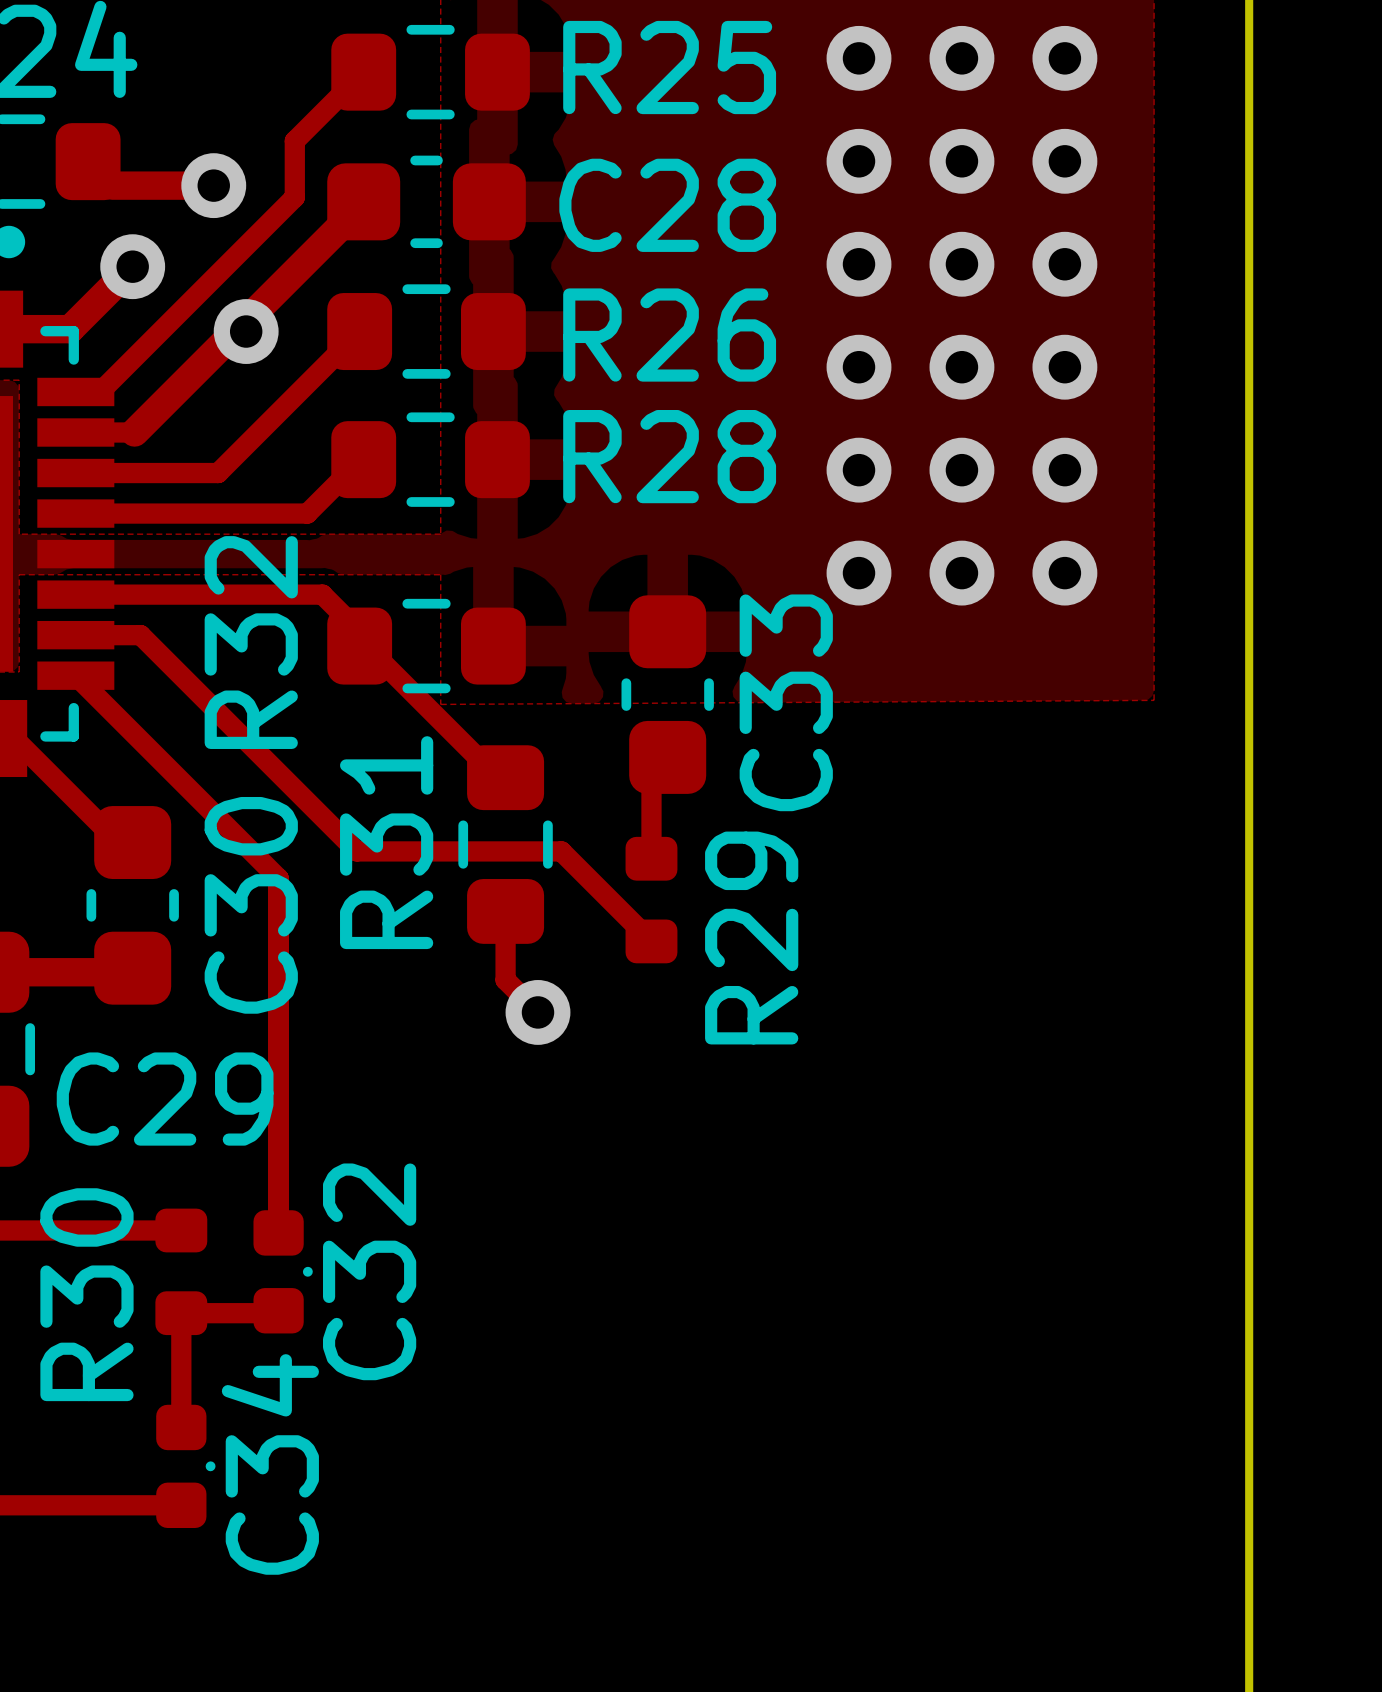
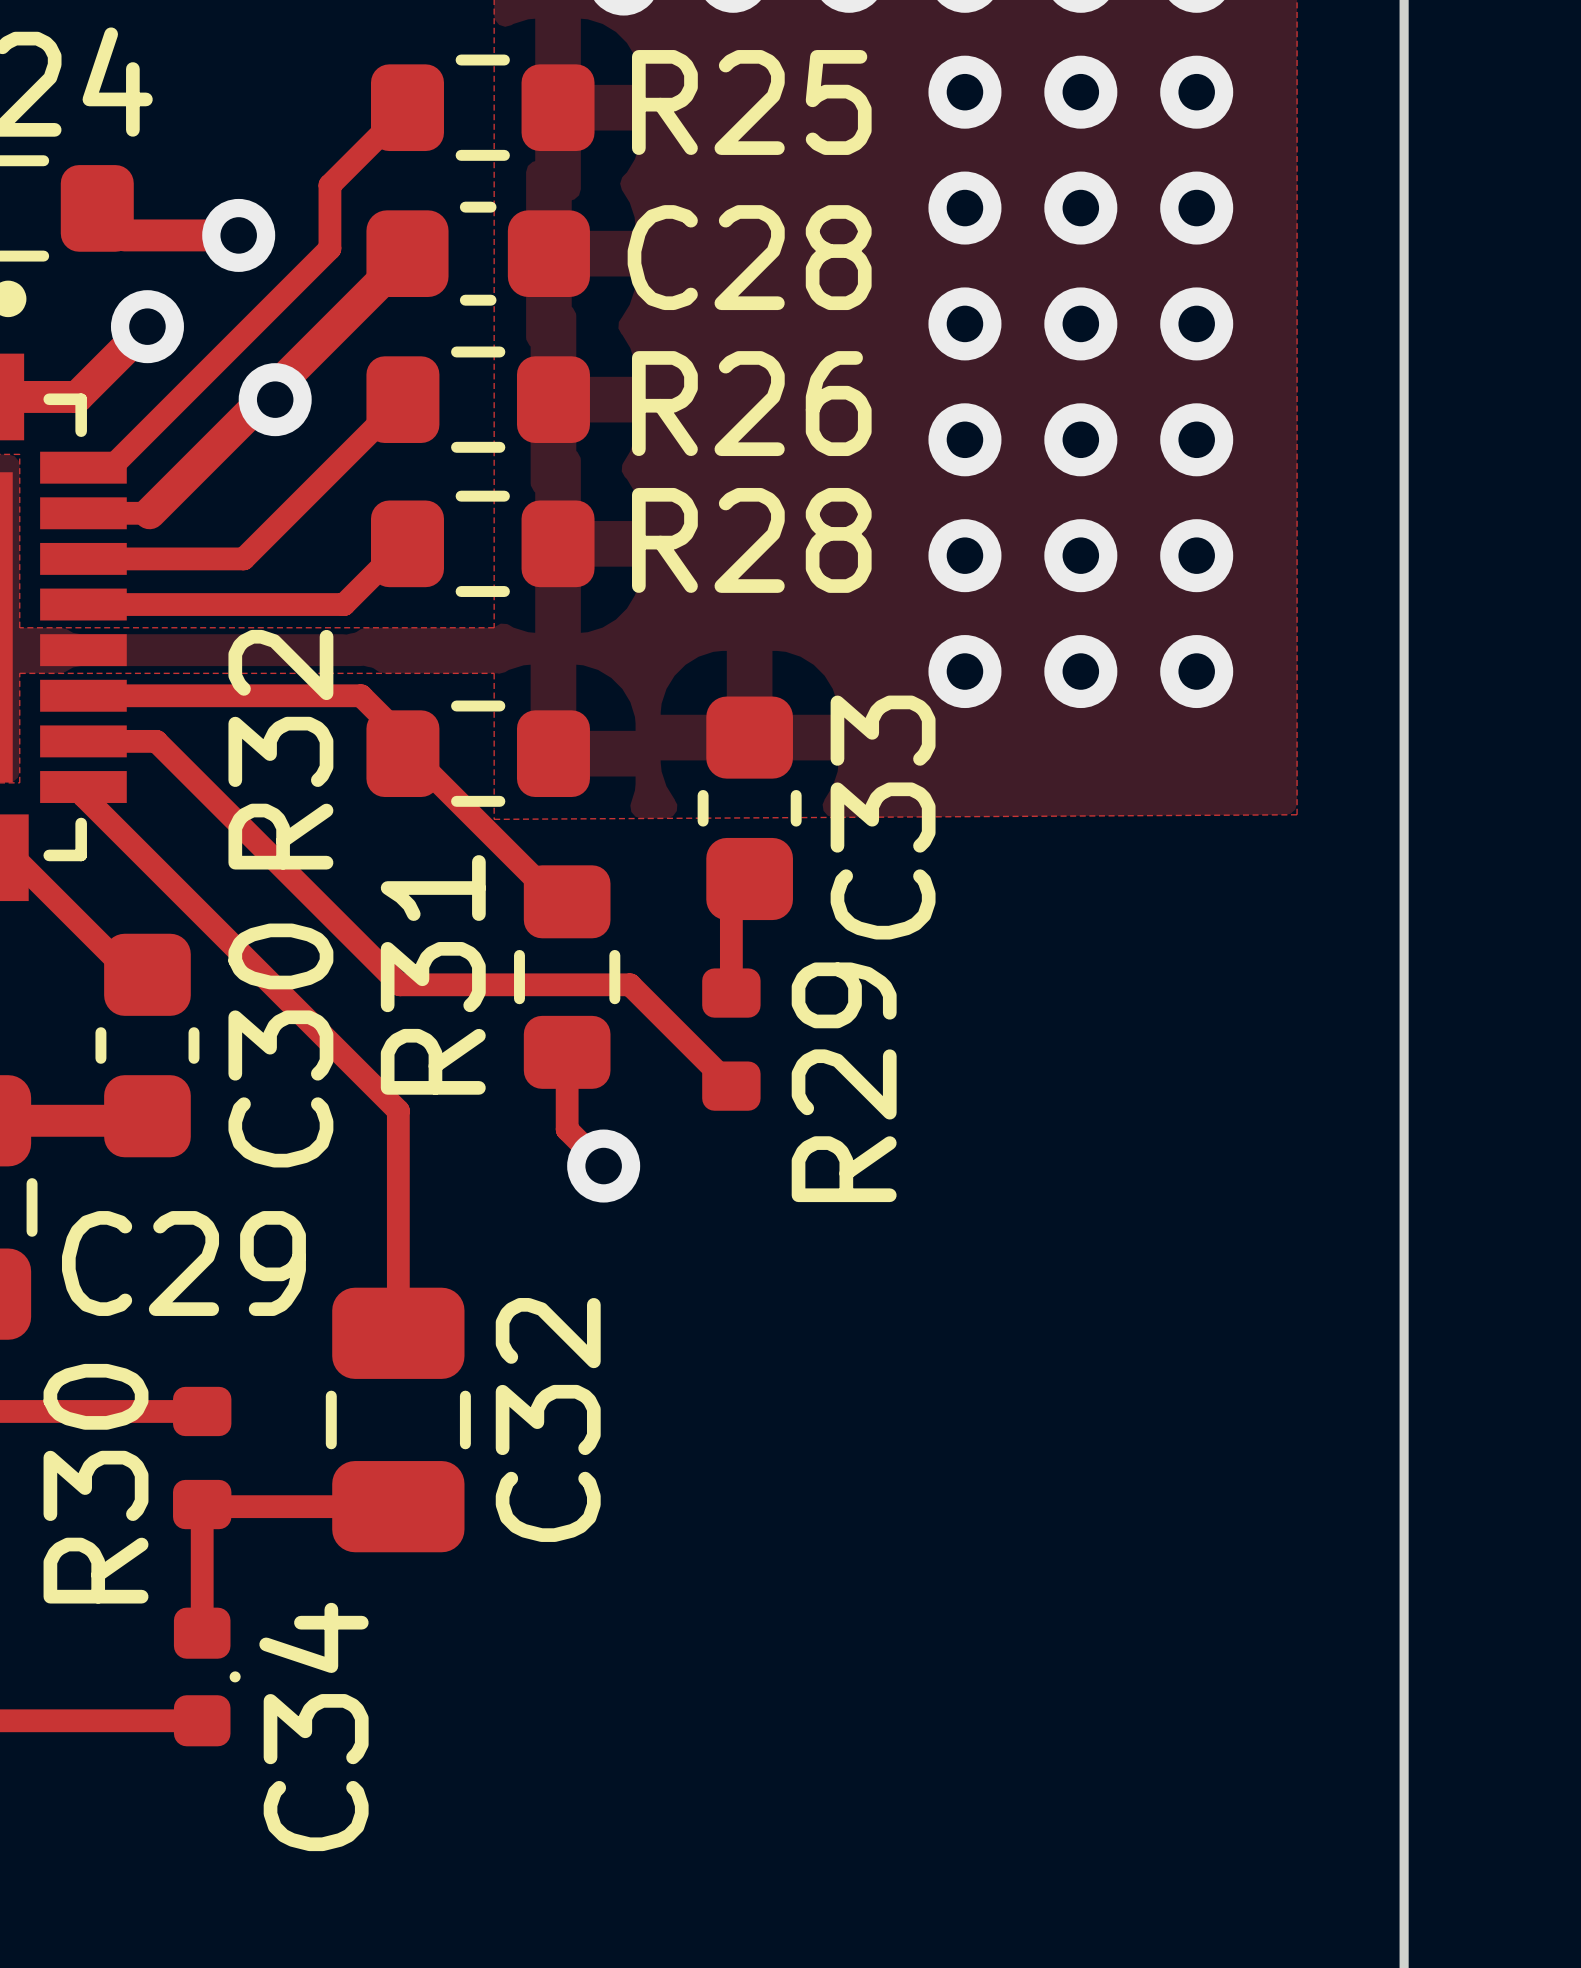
track: (75, 675) (278, 878) (278, 1232) -> (83, 787) (83, 795) (398, 1110) (398, 1333)
C32 footprint: [244, 1210, 313, 1334] -> [325, 1287, 471, 1553]
track: (278, 1310) (276, 1313) (181, 1313) -> (398, 1506) (204, 1506) (202, 1504)
C34 name position: C34 (270, 1464) -> C34 (313, 1726)

